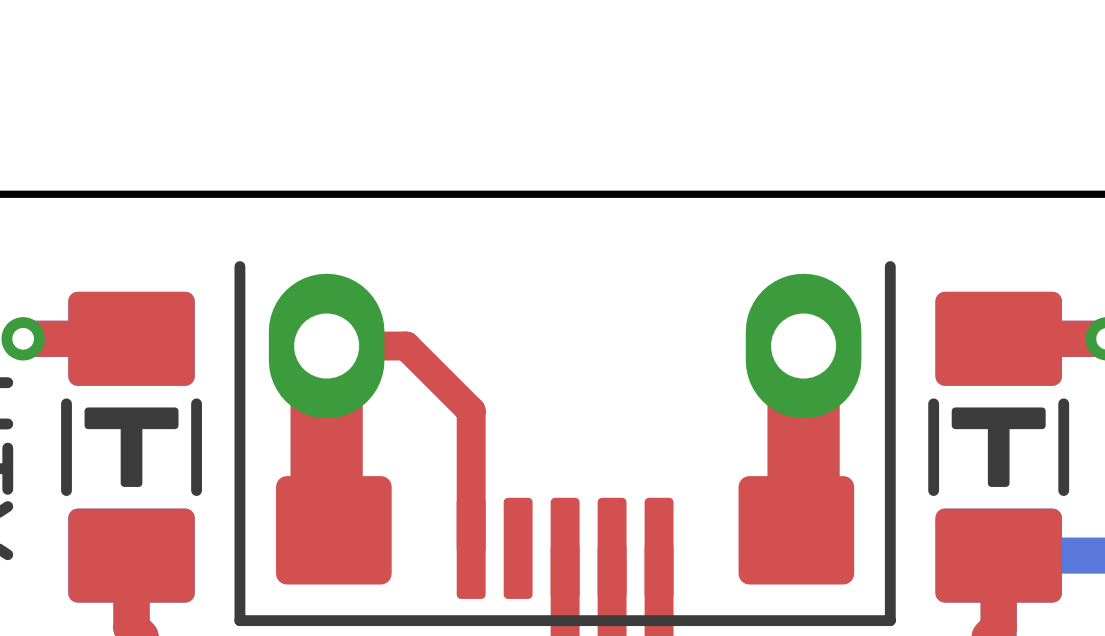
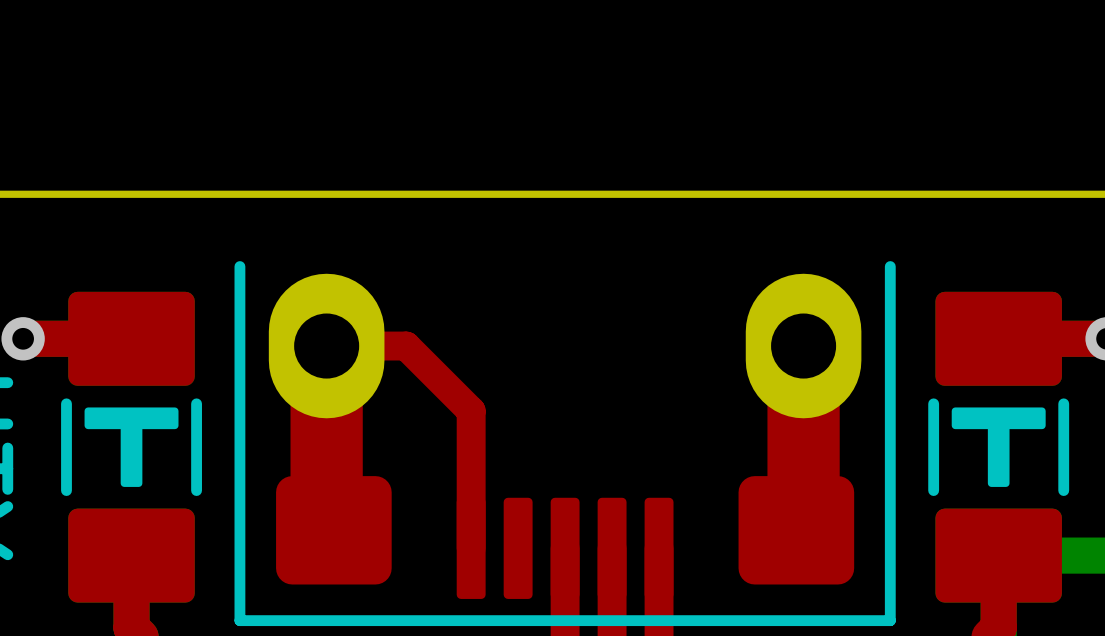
part footprint: [234, 261, 896, 627] -> [234, 261, 896, 627]

